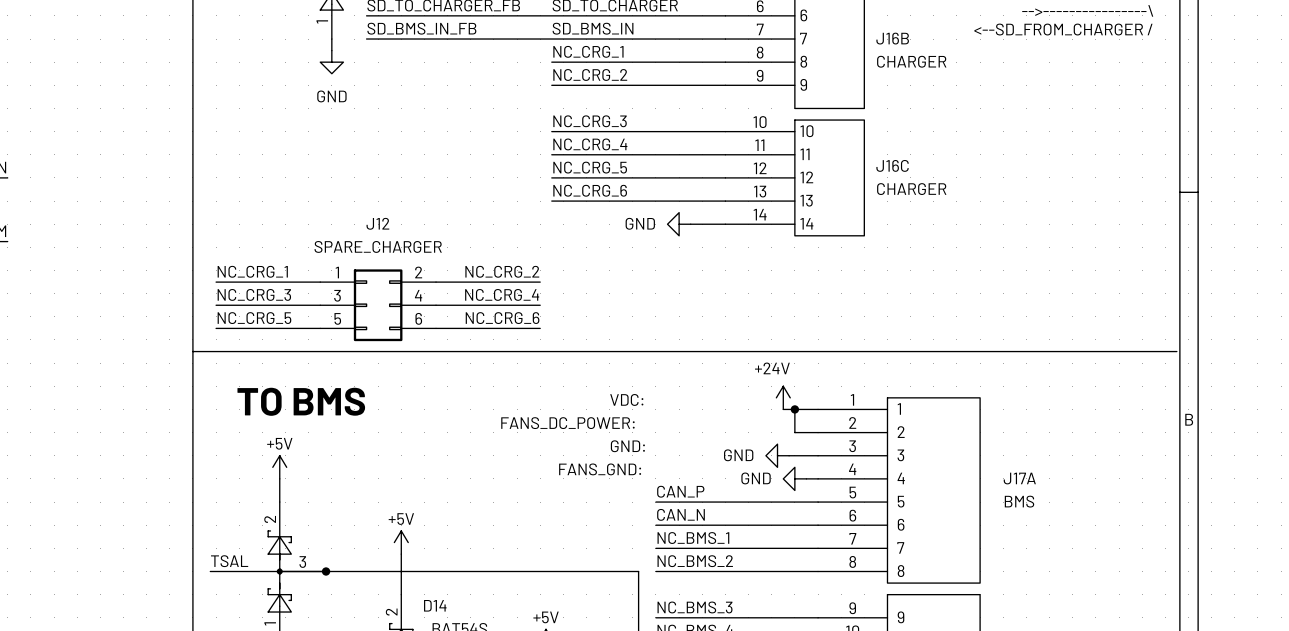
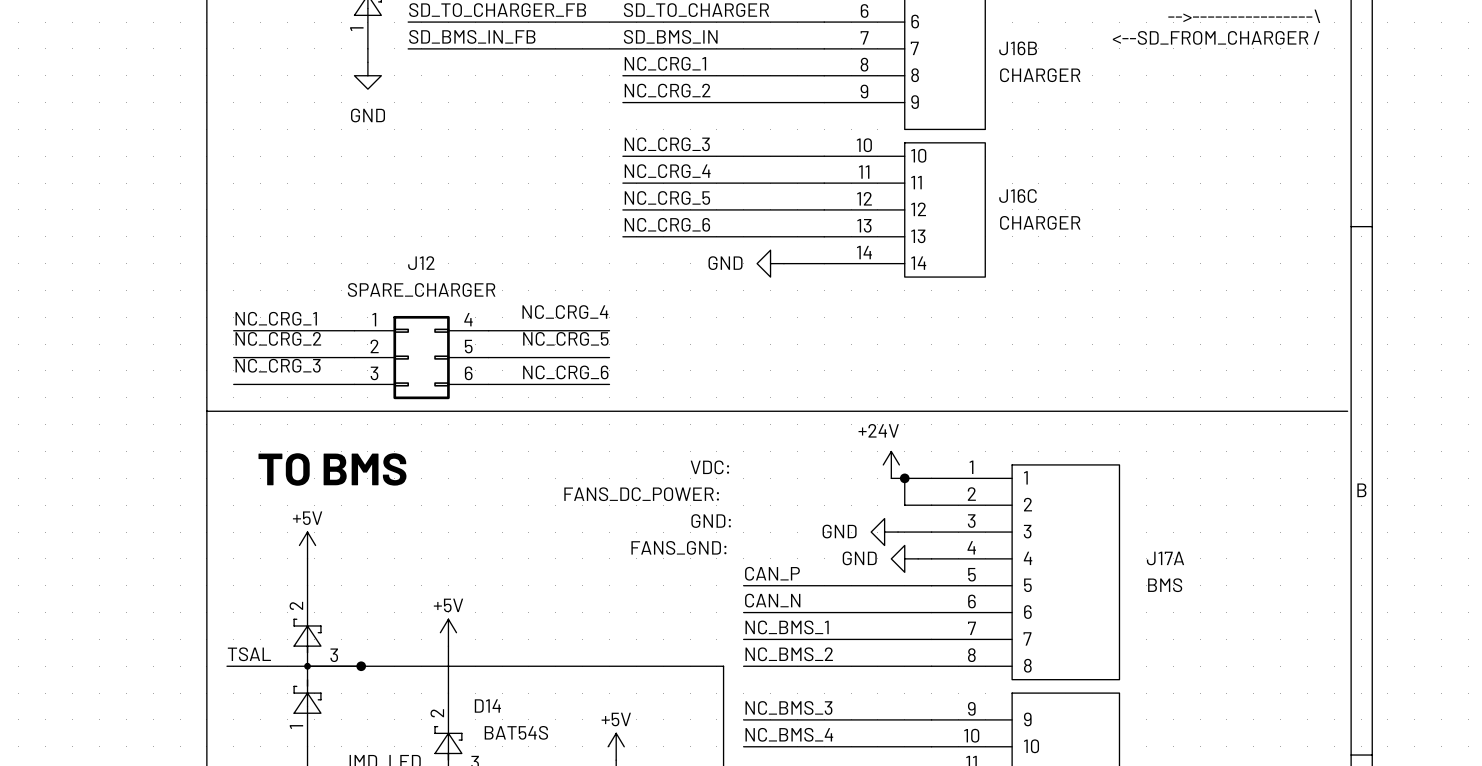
label: NC_CRG_2 (502, 271) -> NC_CRG_4 (565, 312)
J12 pin number: 2 (418, 272) -> 4 (468, 319)
label: NC_CRG_3 (254, 294) -> NC_CRG_2 (278, 338)
label: NC_CRG_4 (502, 294) -> NC_CRG_5 (565, 338)
J12 pin number: 3 (337, 295) -> 2 (374, 346)
J12 pin number: 4 (418, 295) -> 5 (468, 346)
label: NC_CRG_5 (254, 318) -> NC_CRG_3 (278, 365)
J12 pin number: 5 (337, 318) -> 3 (374, 373)

